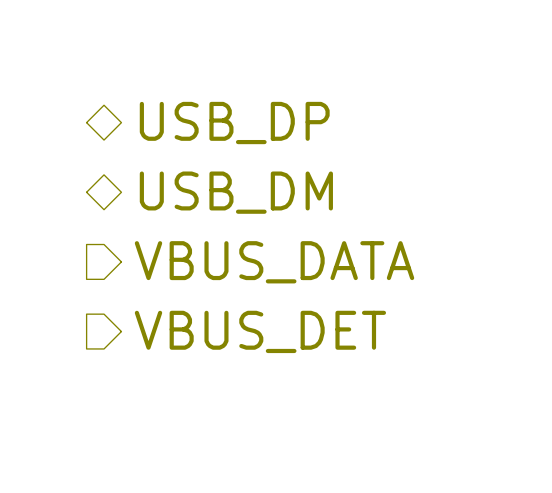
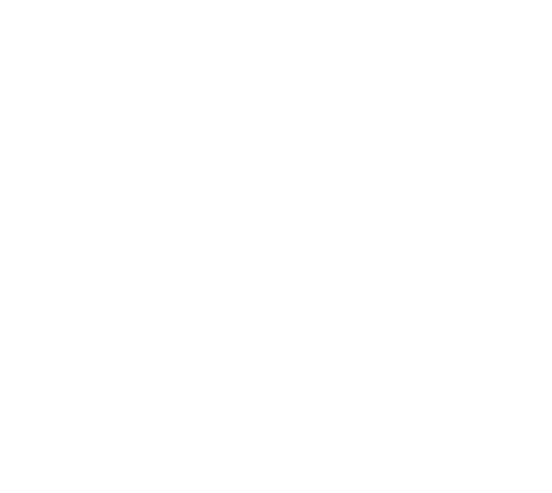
hierarchical label: USB_DP (234, 123) -> none
hierarchical label: USB_DM (236, 192) -> none
hierarchical label: VBUS_DATA (274, 262) -> none
hierarchical label: VBUS_DET (260, 331) -> none

